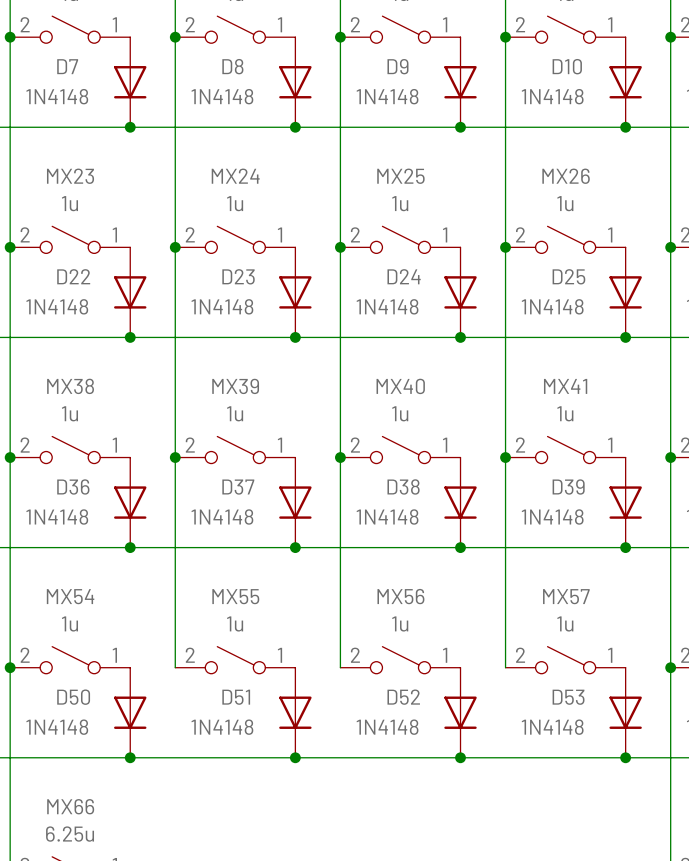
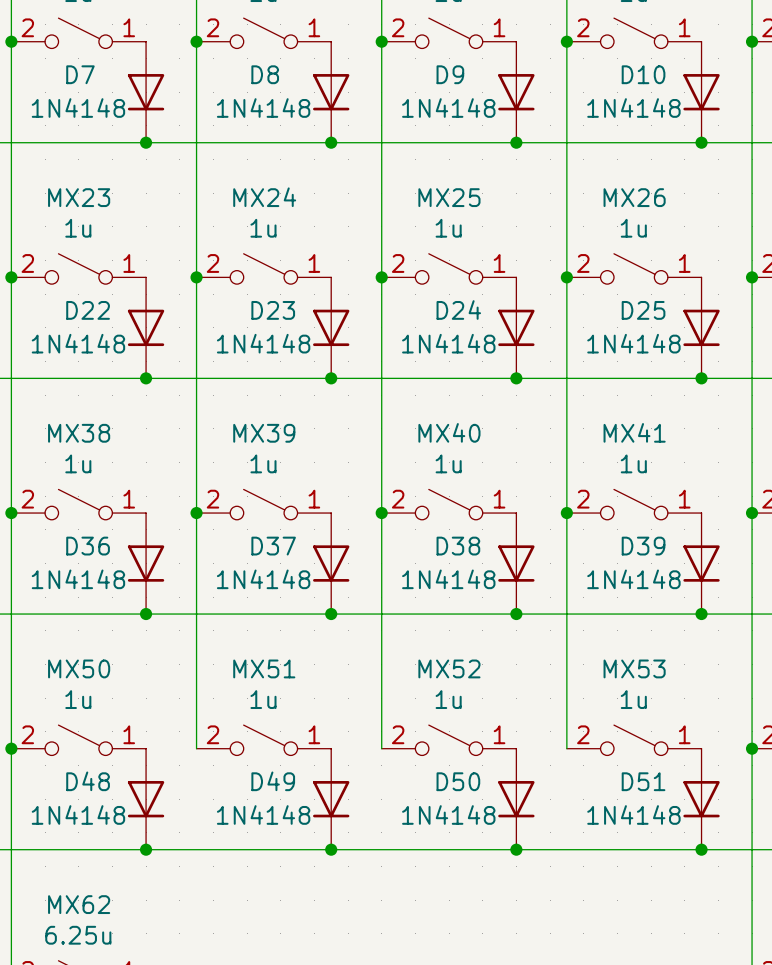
MX54 name: MX54 (70, 596) -> MX50 (79, 668)
MX55 name: MX55 (235, 596) -> MX51 (264, 668)
MX56 name: MX56 (400, 596) -> MX52 (449, 668)
MX57 name: MX57 (566, 596) -> MX53 (634, 668)
D50 name: D50 (73, 697) -> D48 (88, 781)
D51 name: D51 (236, 697) -> D49 (273, 781)
D52 name: D52 (403, 697) -> D50 (458, 781)
D53 name: D53 (568, 697) -> D51 (643, 781)
MX66 name: MX66 (70, 806) -> MX62 (79, 904)

